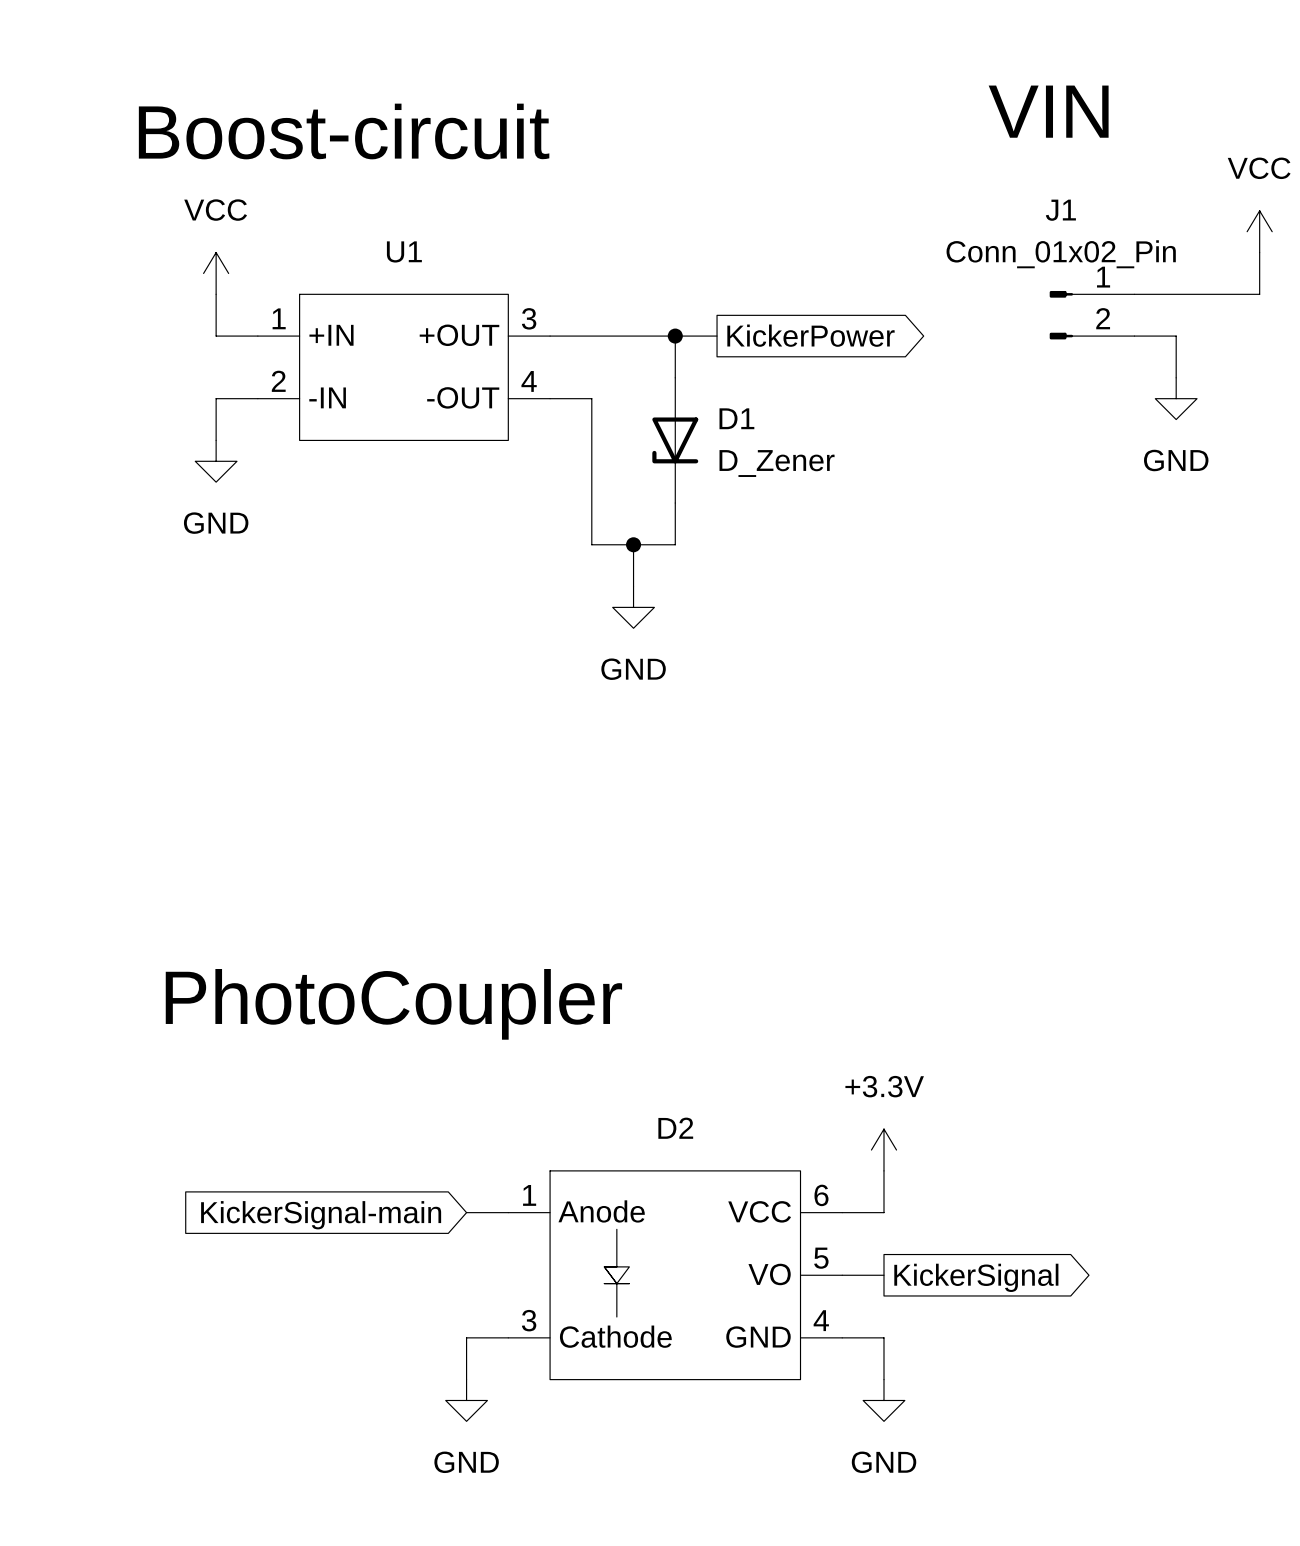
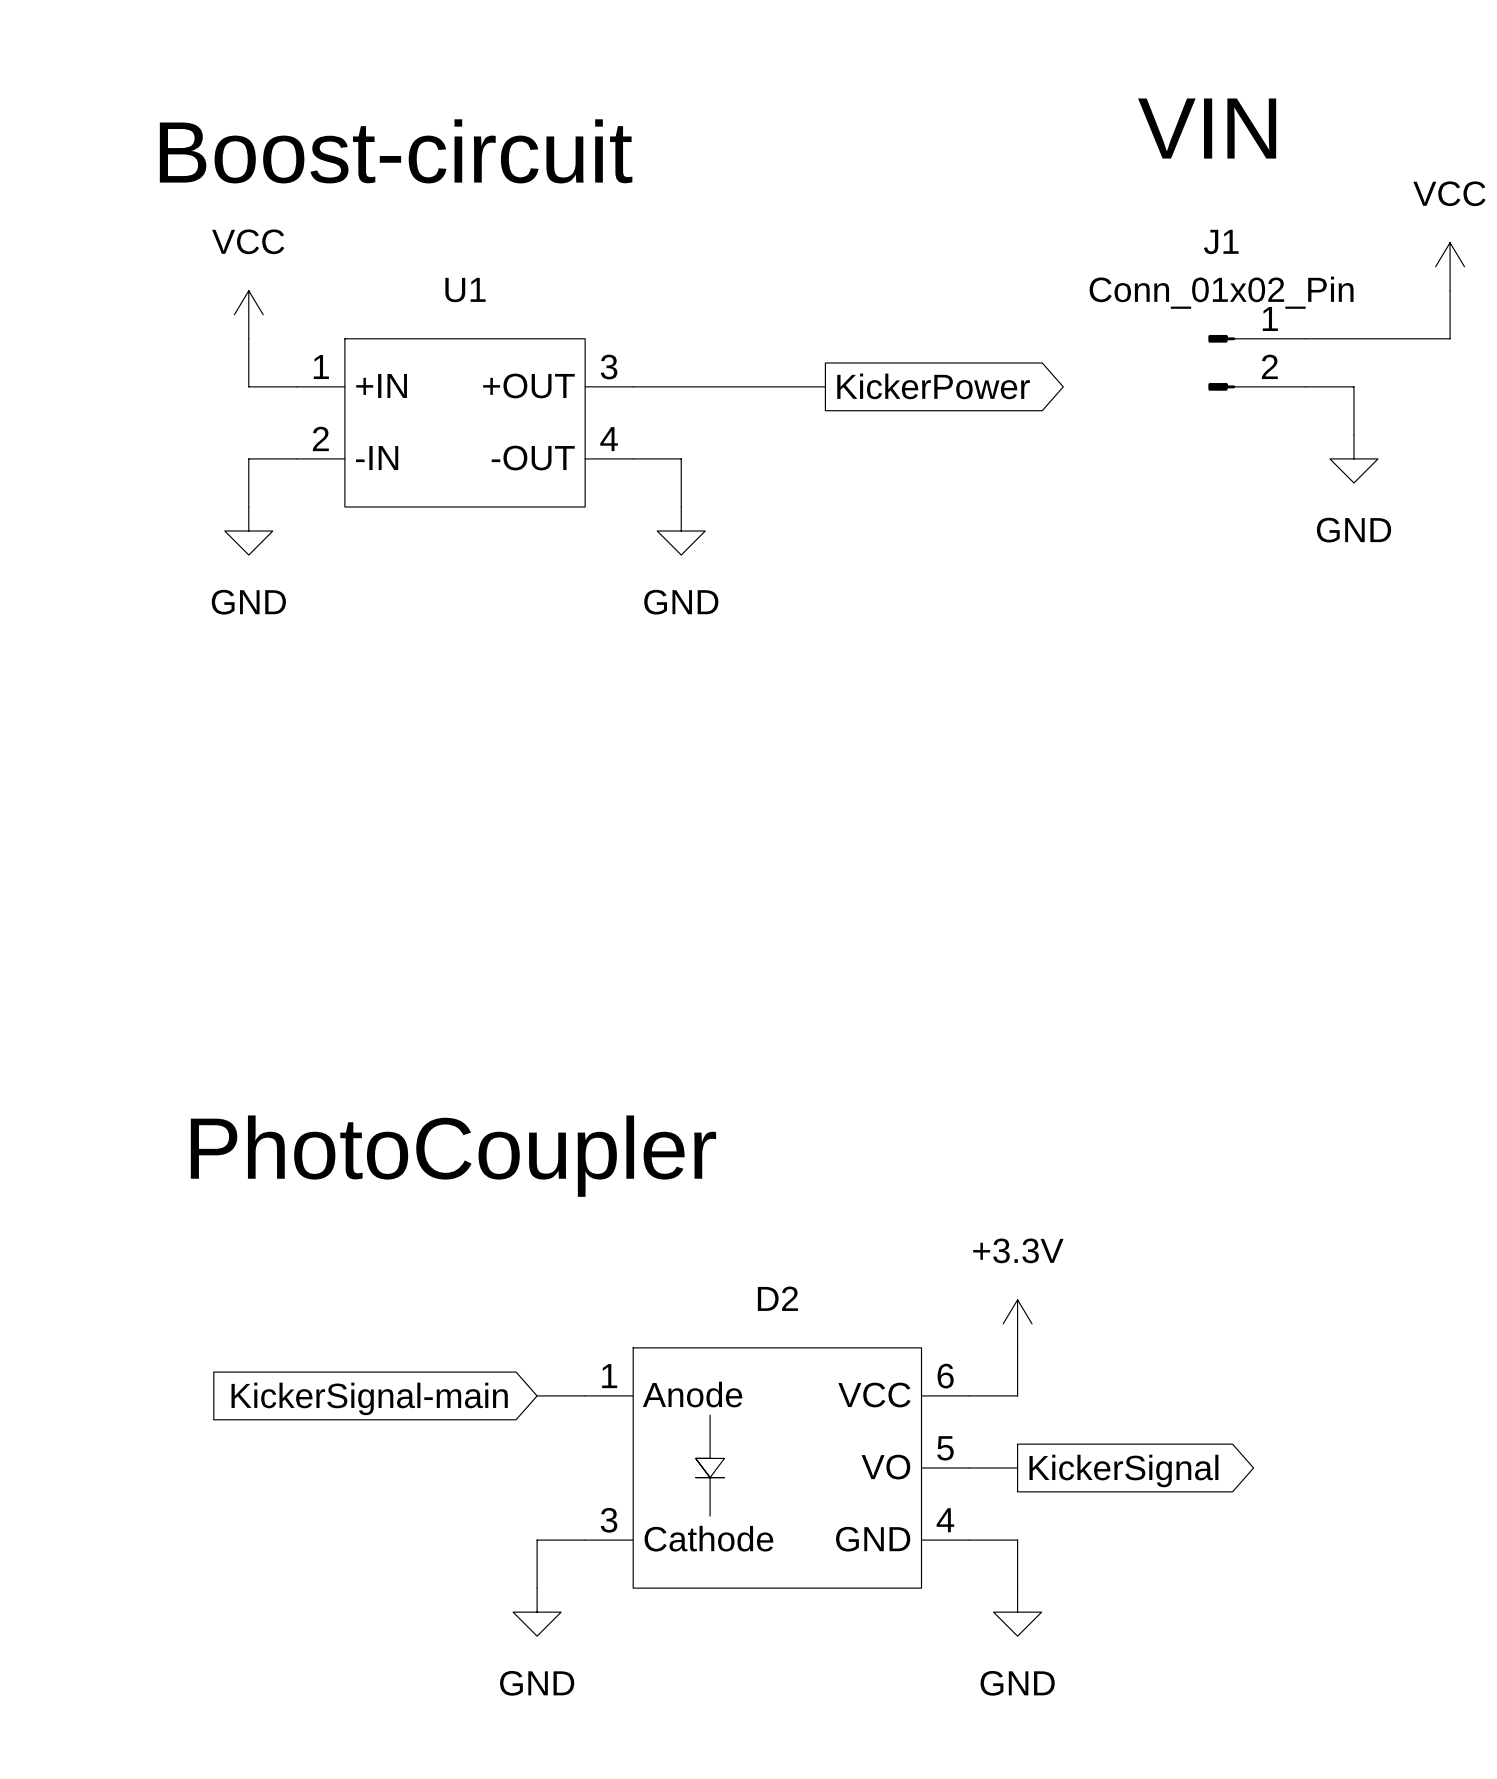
wire: (675, 336) (675, 377) -> none
junction: (675, 336) -> none
wire: (591, 440) (591, 544) (675, 544) (675, 503) -> none
D1: D_Zener (675, 440) -> none
wire: (633, 544) (633, 586) -> none
junction: (633, 544) -> none
power symbol position: GND (633, 607) -> GND (681, 531)

